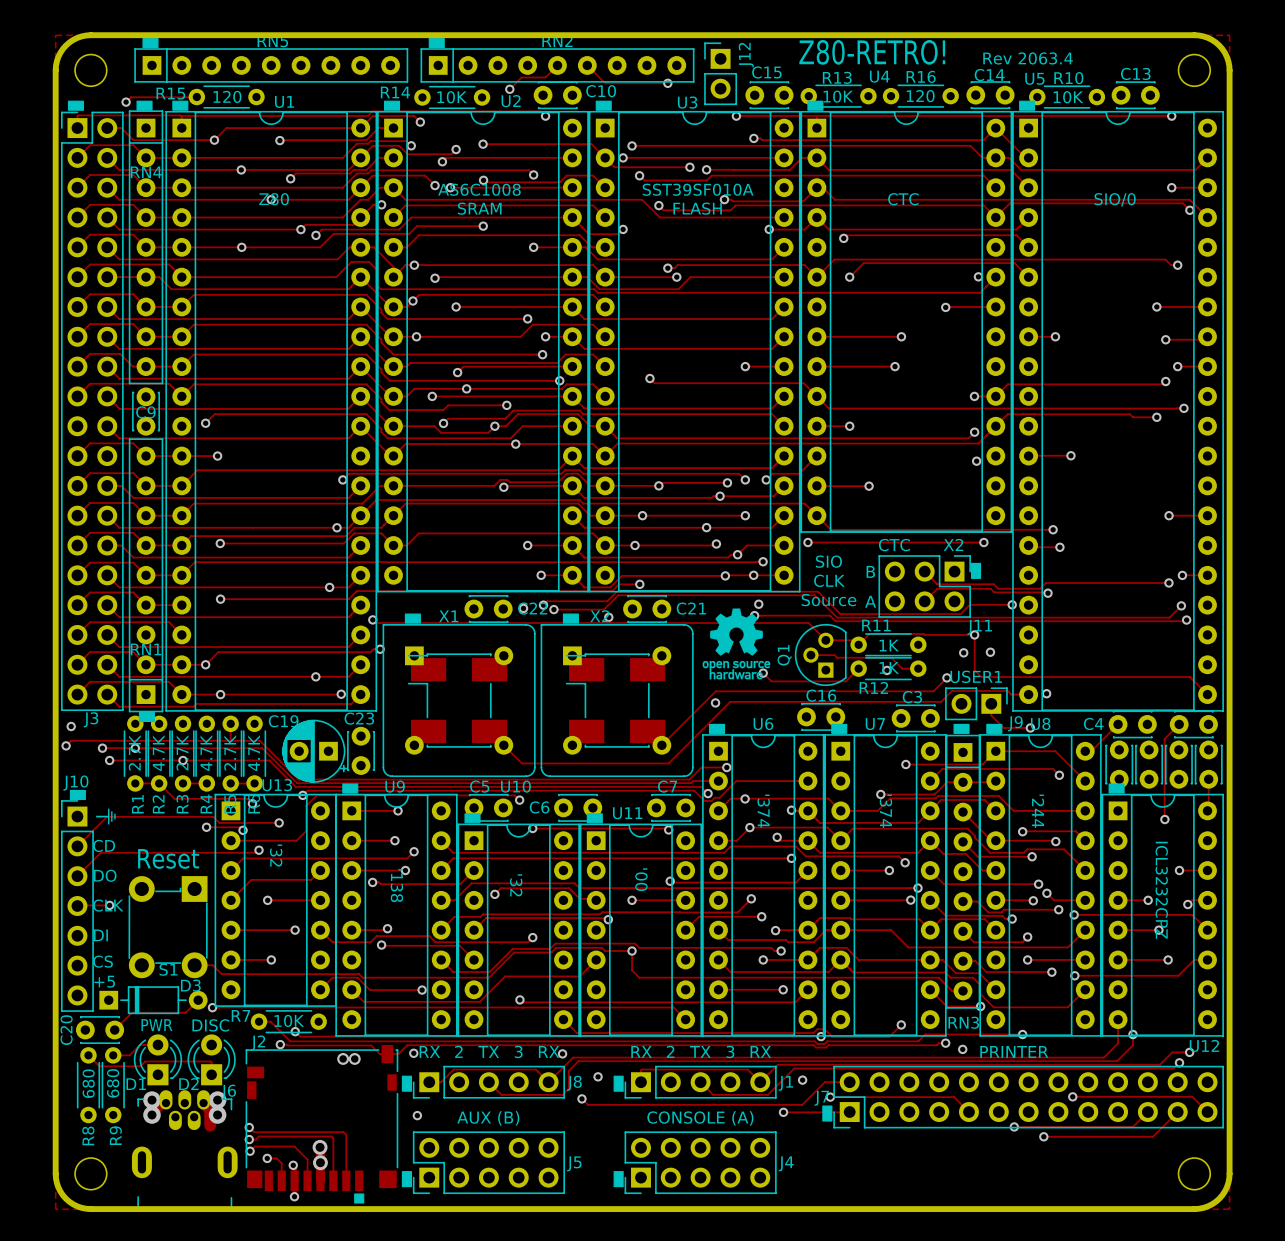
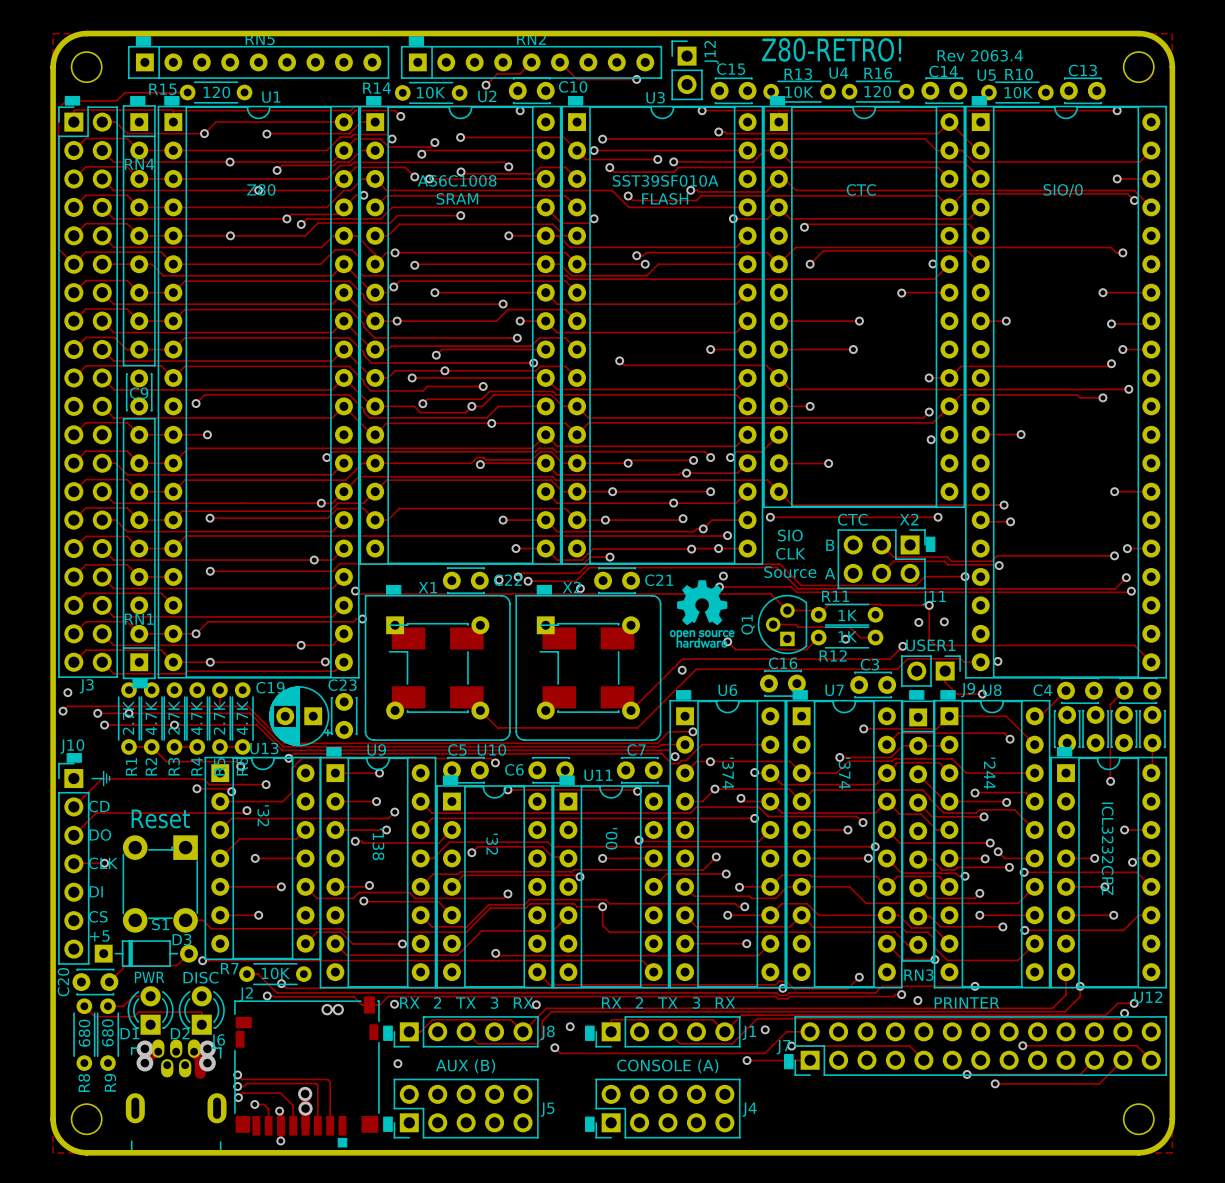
track: none -> (120, 97) (116, 100) (66, 100) (58, 108) (58, 248) (73, 264)
via: (126, 102) -> none

